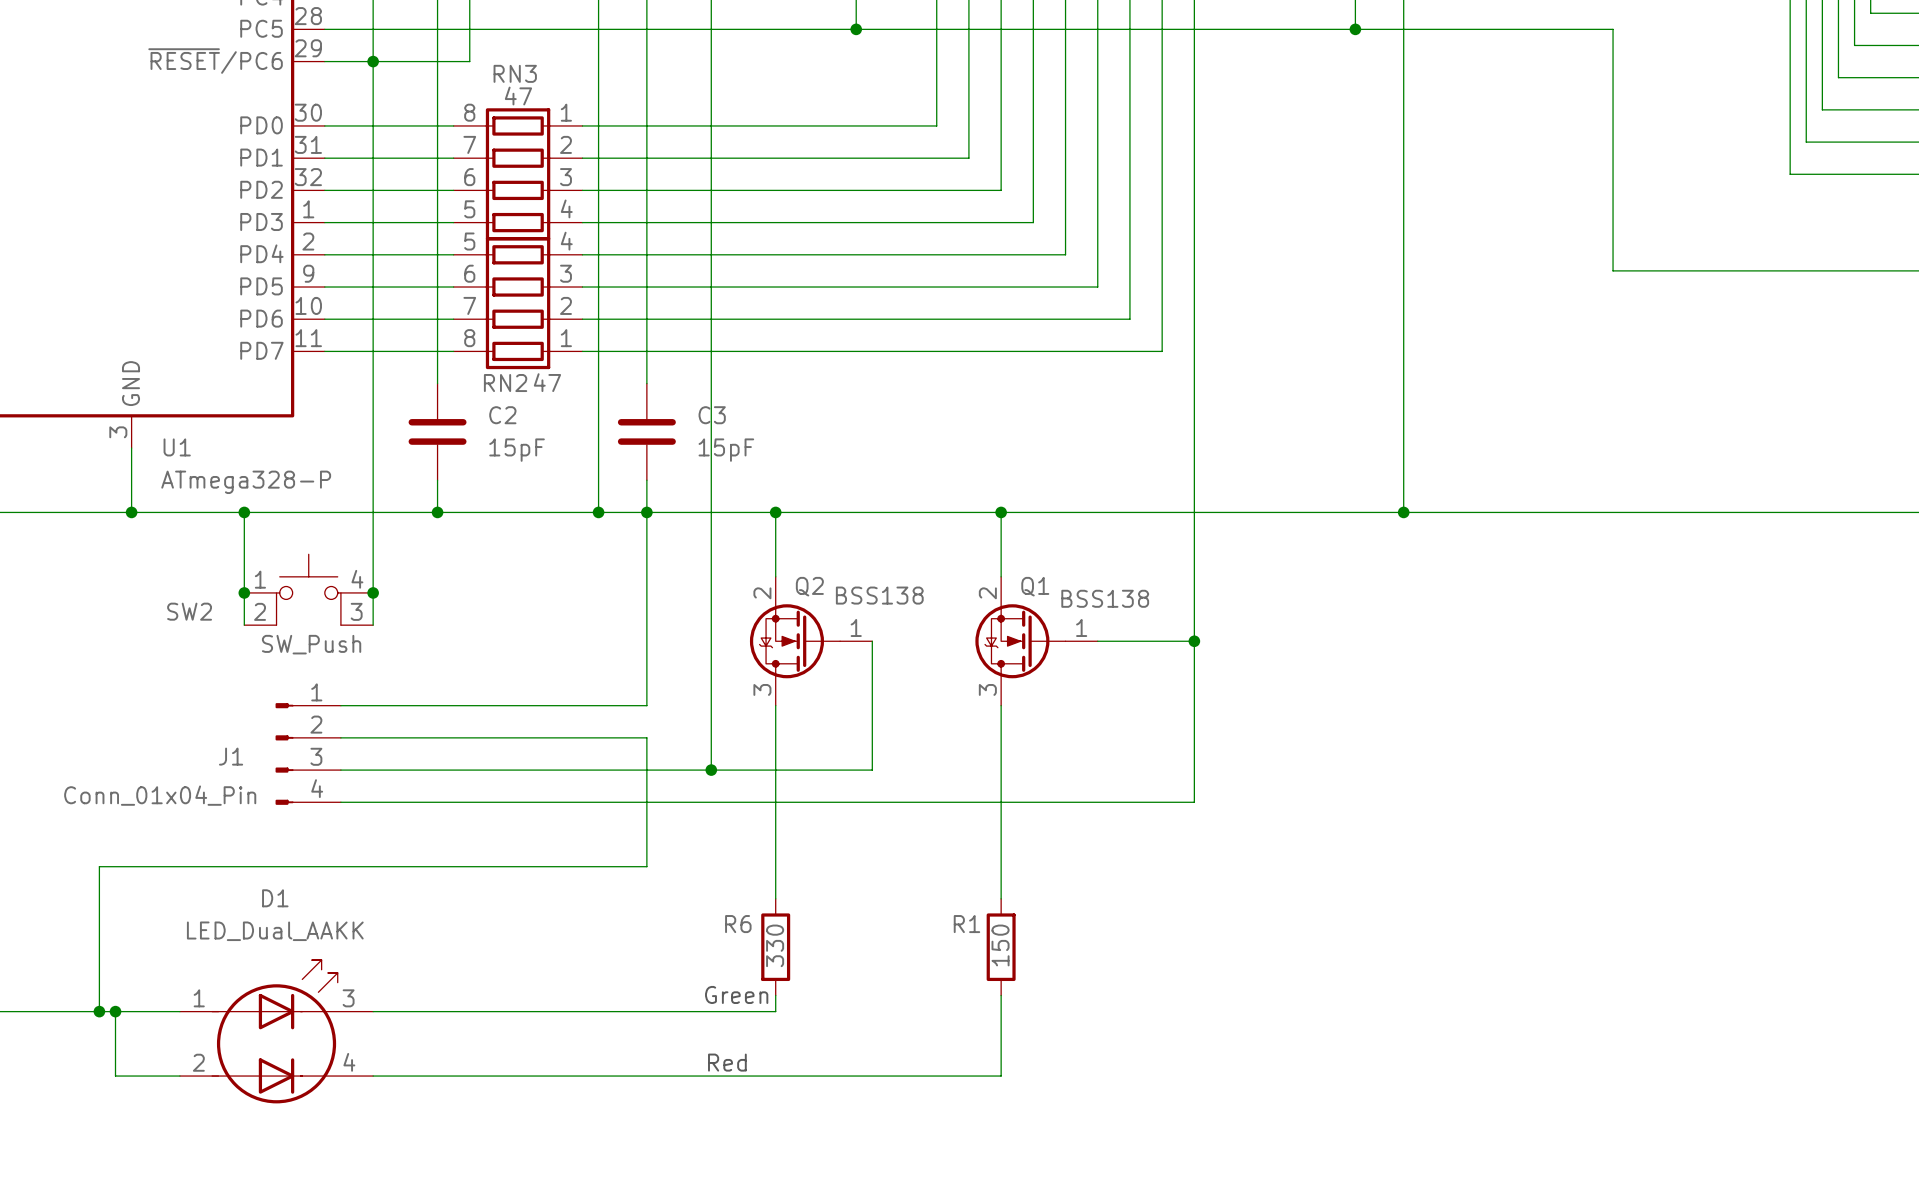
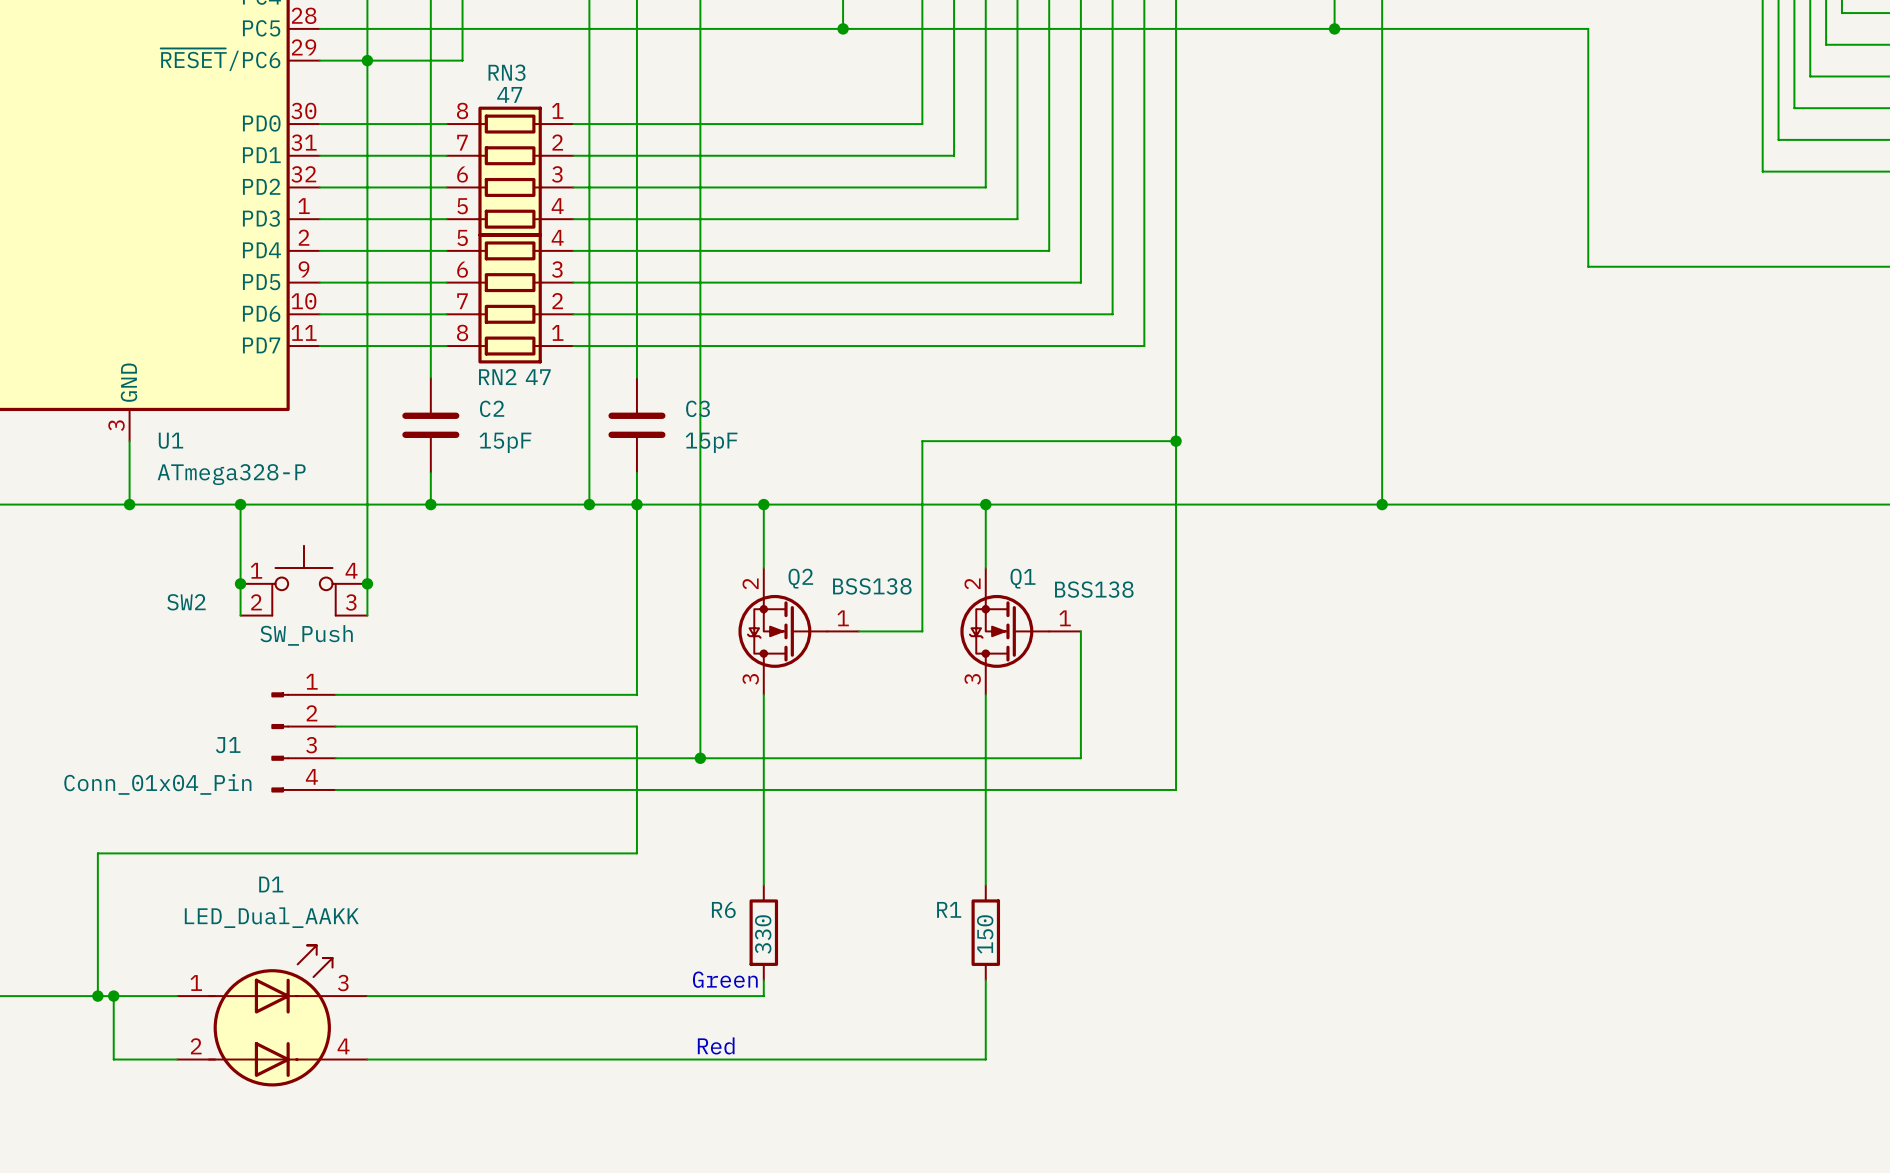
wire: none -> (1176, 441) (922, 441) (922, 631) (858, 631)
junction: none -> (1176, 441)
wire: (872, 641) (872, 770) -> (1080, 631) (1080, 758) (858, 758)
wire: (1097, 641) (1194, 641) -> none
junction: (1194, 641) -> none

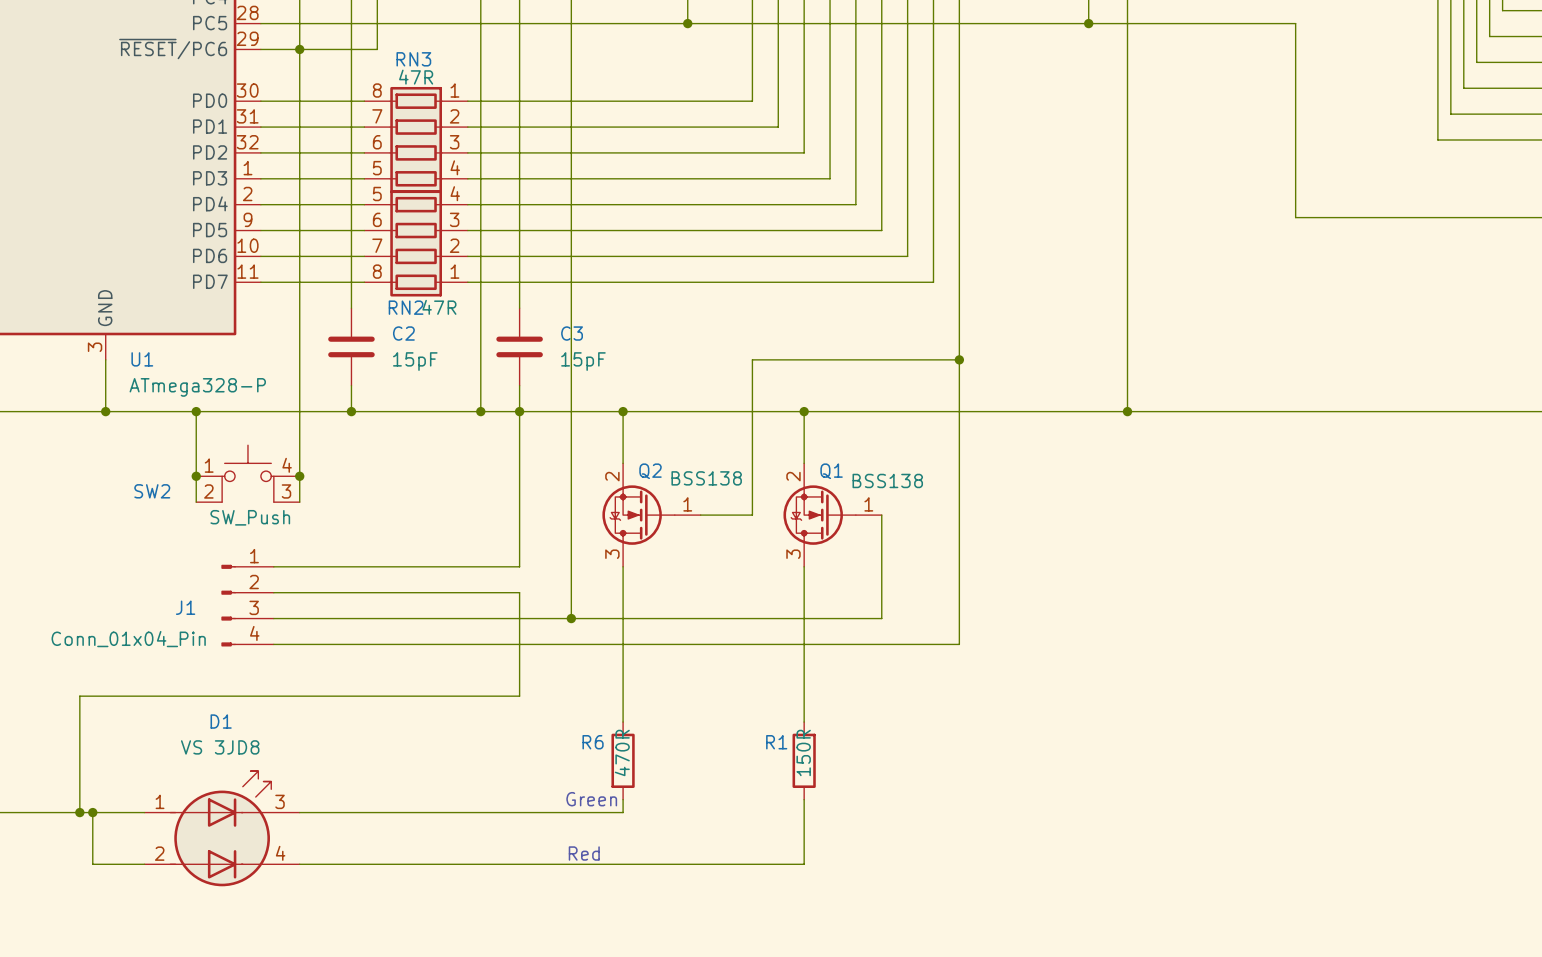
RN3 value: 47 (509, 94) -> 47R (416, 77)
RN2 value: 47 (538, 377) -> 47R (439, 307)
D1 value: LED_Dual_AAKK (271, 917) -> VS 3JD8 (220, 747)
R6 value: 330 (763, 934) -> 470R (622, 752)
R1 value: 150 (985, 934) -> 150R (803, 752)

